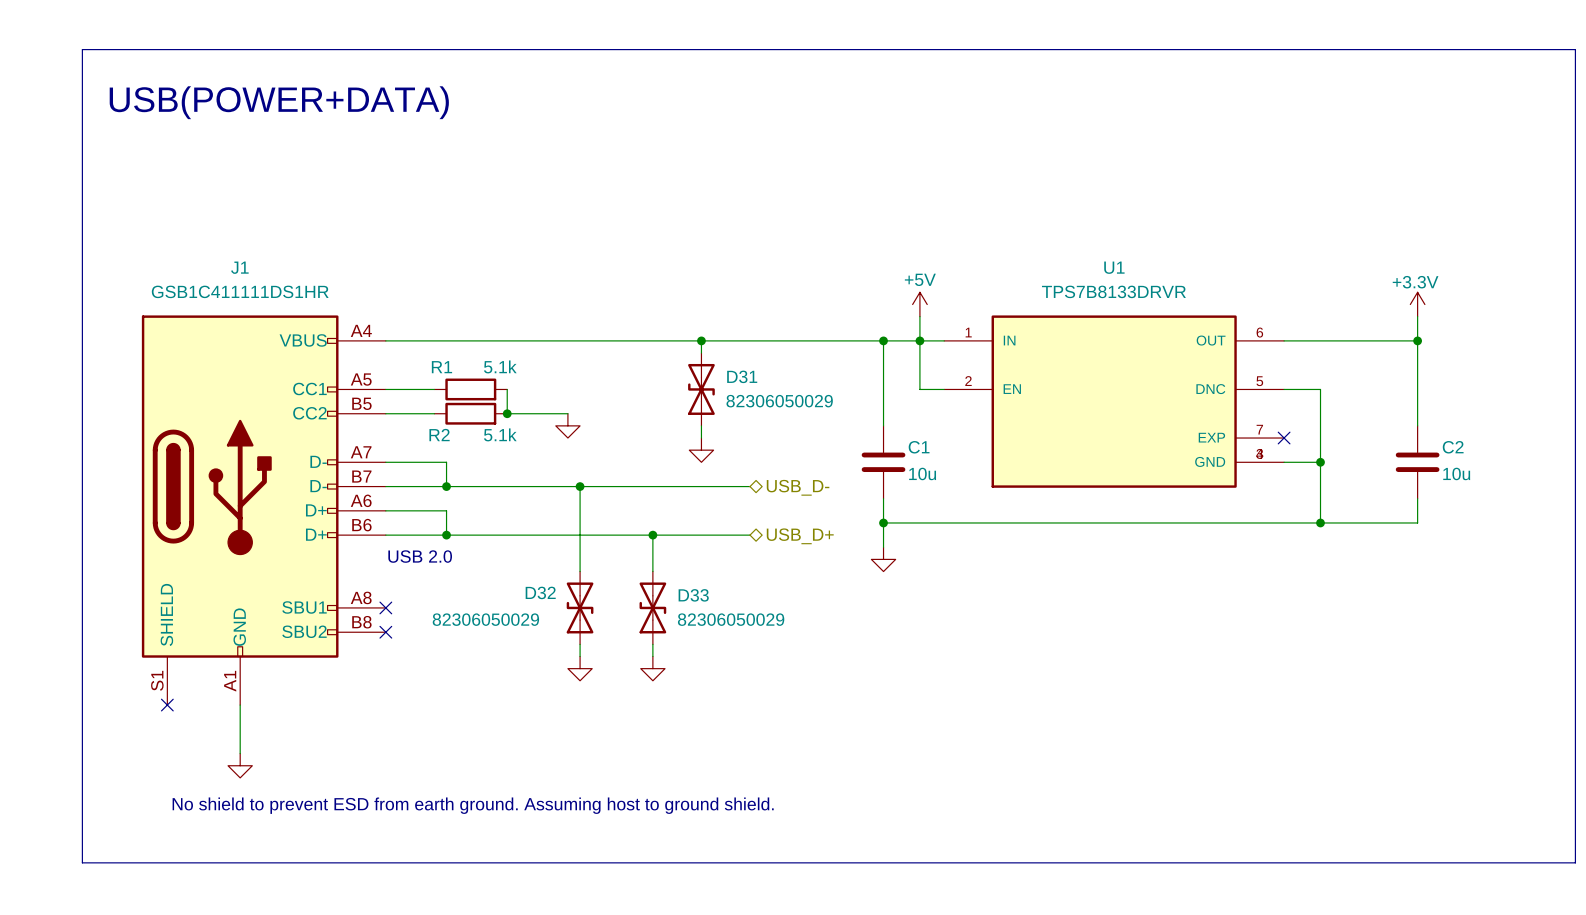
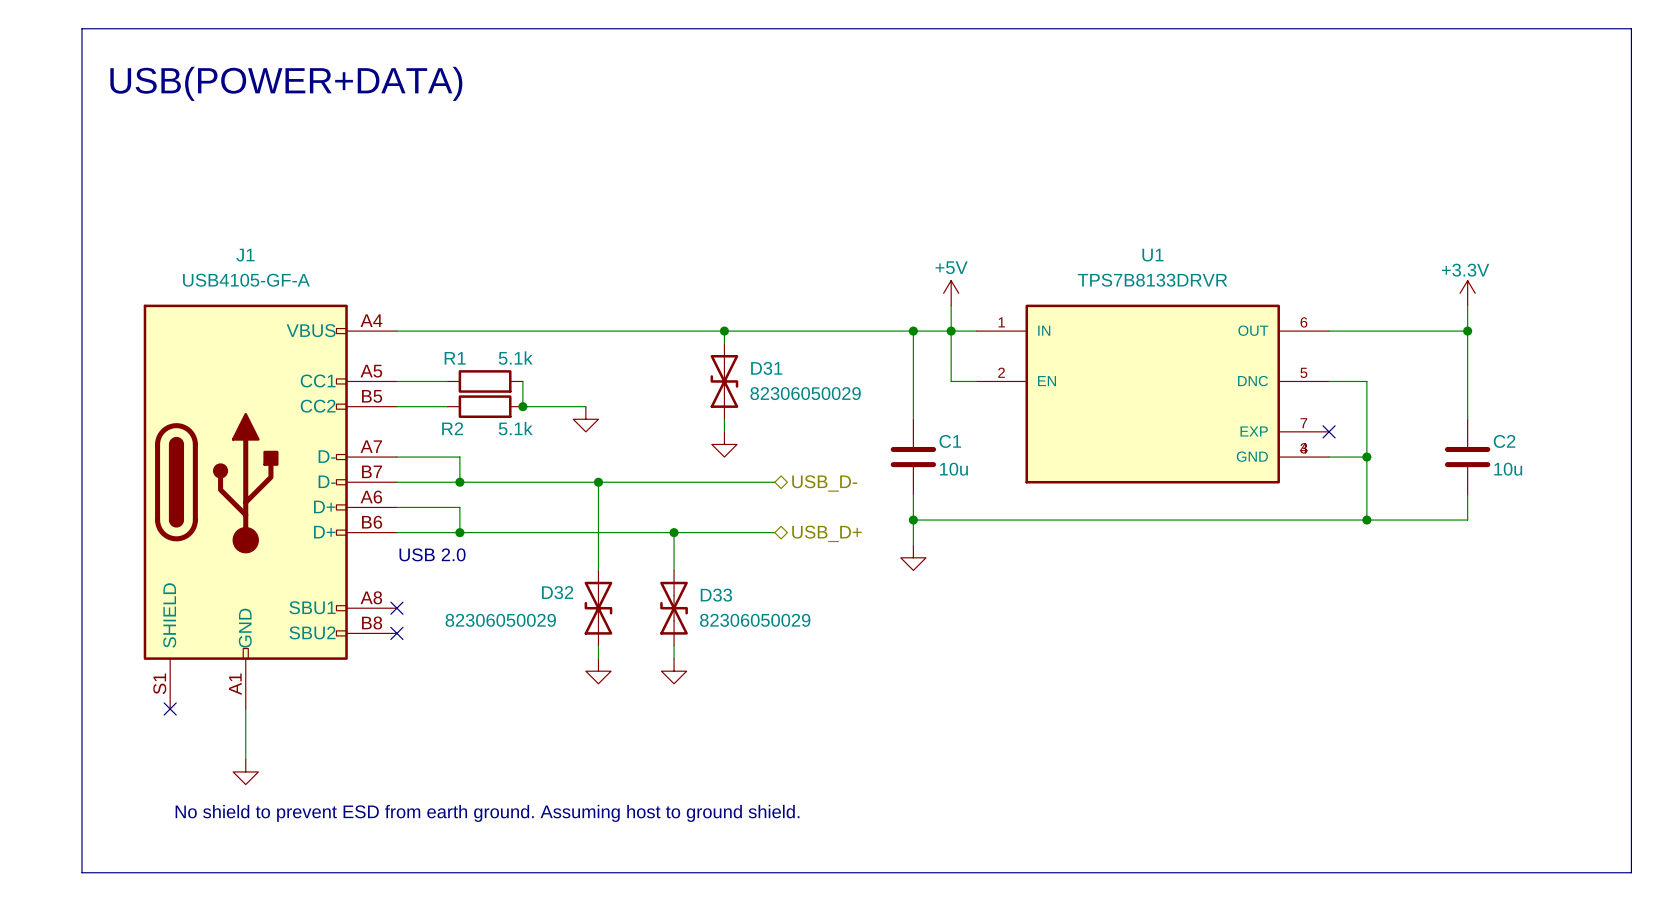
J1 value: GSB1C411111DS1HR (240, 291) -> USB4105-GF-A (246, 280)

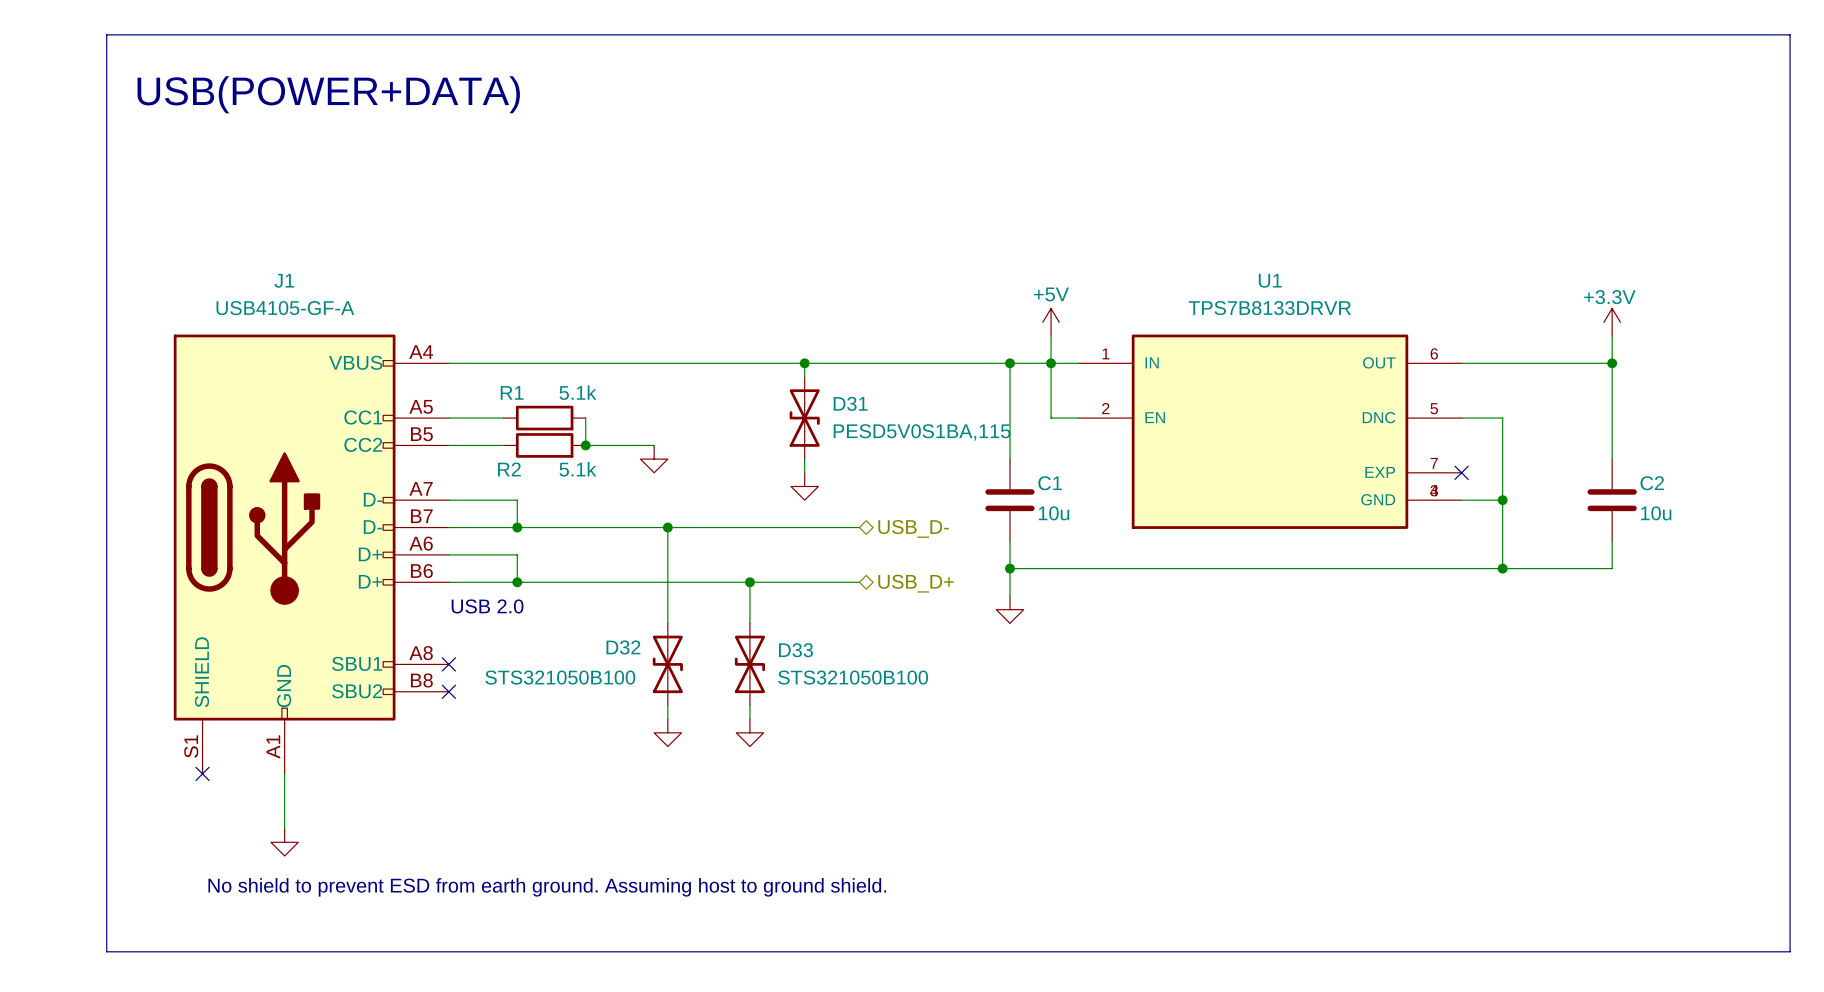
D31 value: 82306050029 (805, 393) -> PESD5V0S1BA,115 (922, 432)
D32 value: 82306050029 (500, 620) -> STS321050B100 (560, 677)
D33 value: 82306050029 (755, 620) -> STS321050B100 (853, 677)

